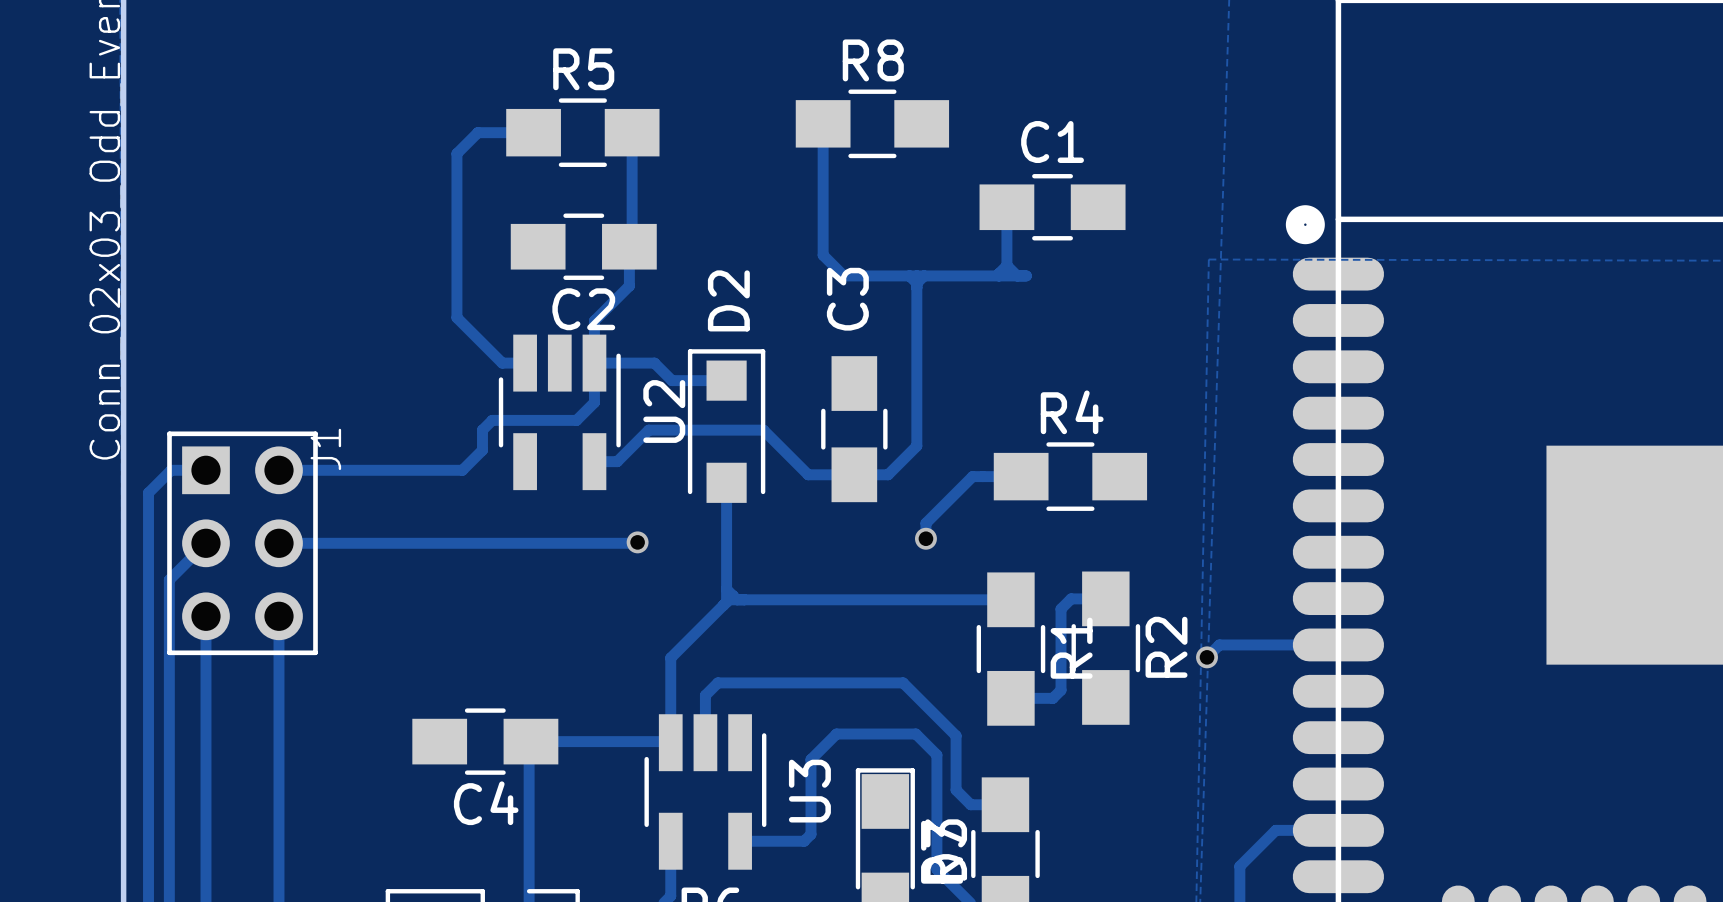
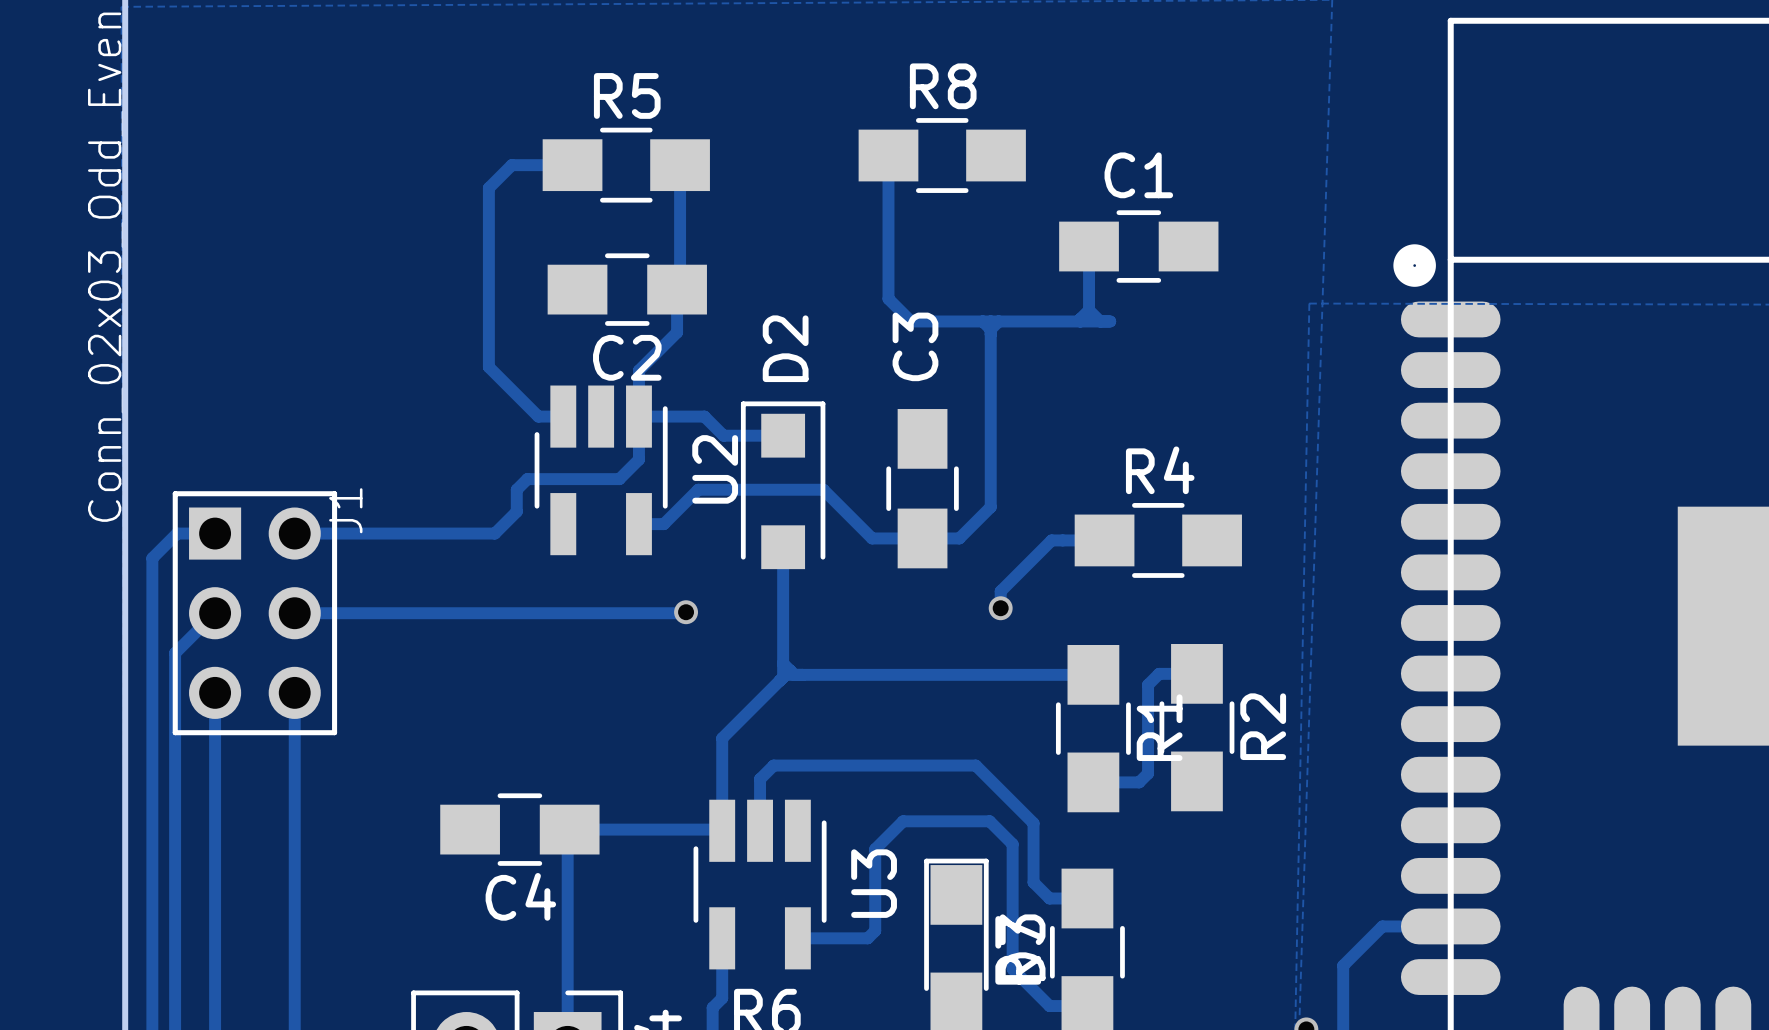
track: (1338, 644) (1219, 644) (1207, 657) -> none
via: (1207, 657) -> none

